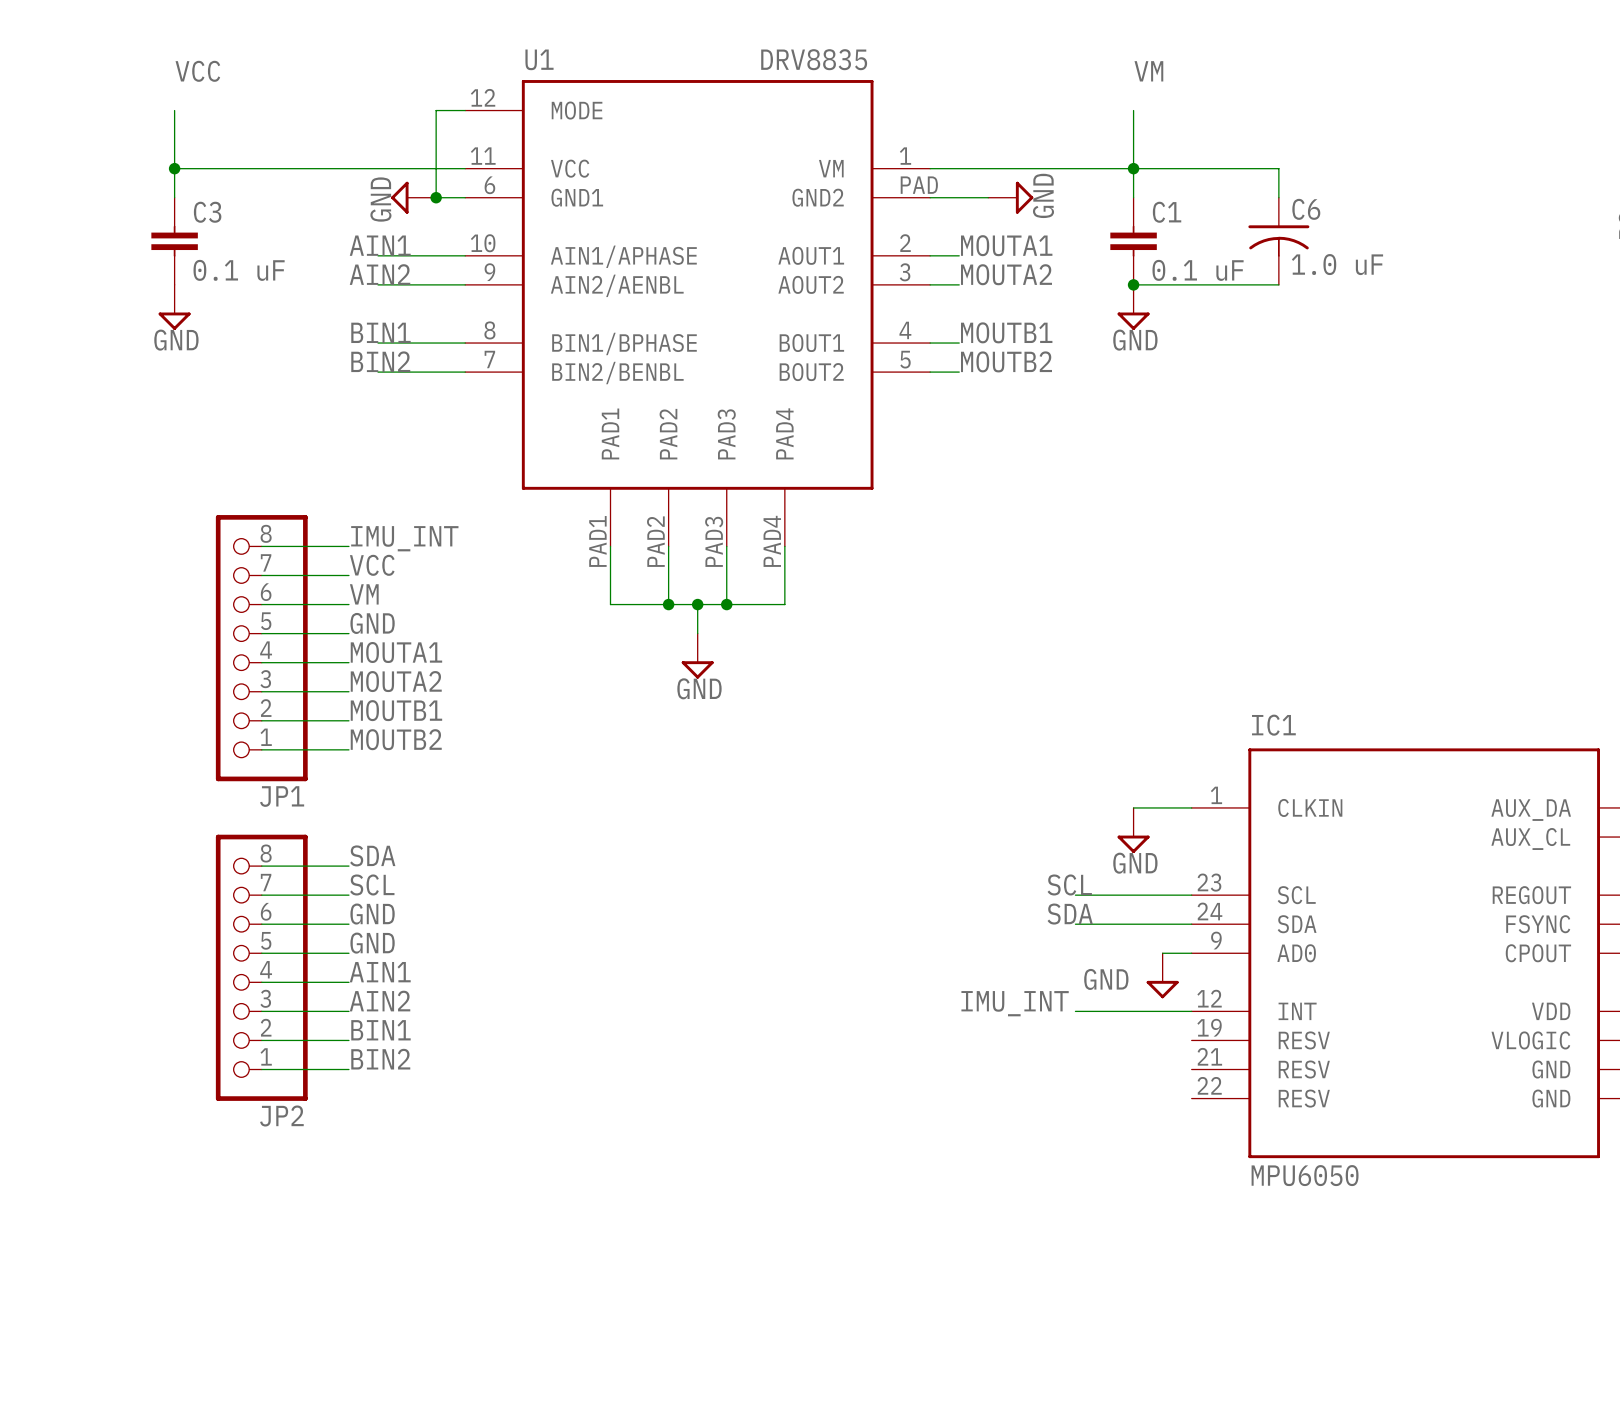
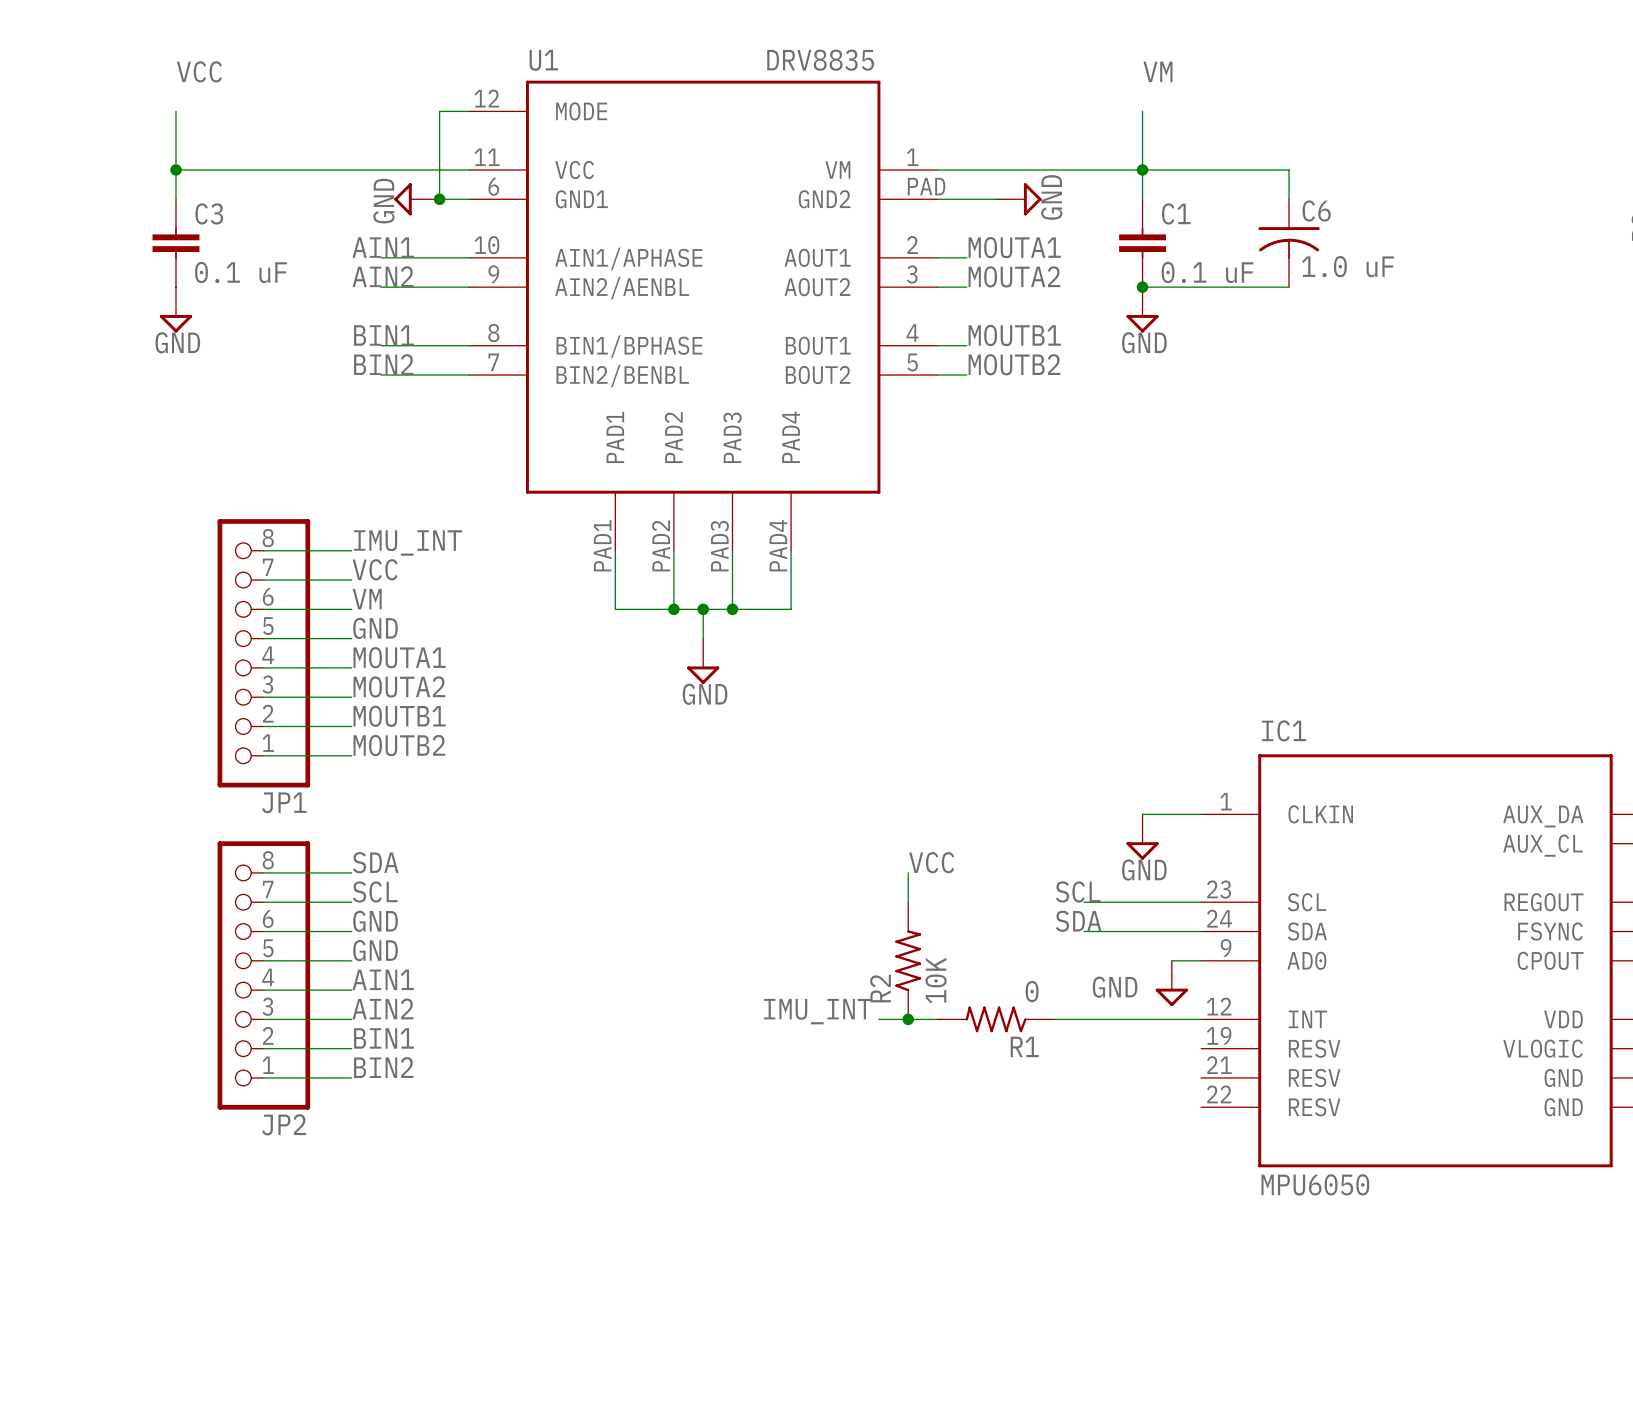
label: none -> VCC (931, 862)
wire: none -> (908, 872) (908, 902)
R2: none -> 10K (908, 960)
label position: IMU_INT (1015, 1003) -> IMU_INT (818, 1011)
wire: none -> (878, 1019) (937, 1019)
junction: none -> (908, 1019)
R1: none -> 0 (996, 1019)
wire: none -> (1054, 1019) (1083, 1019)

